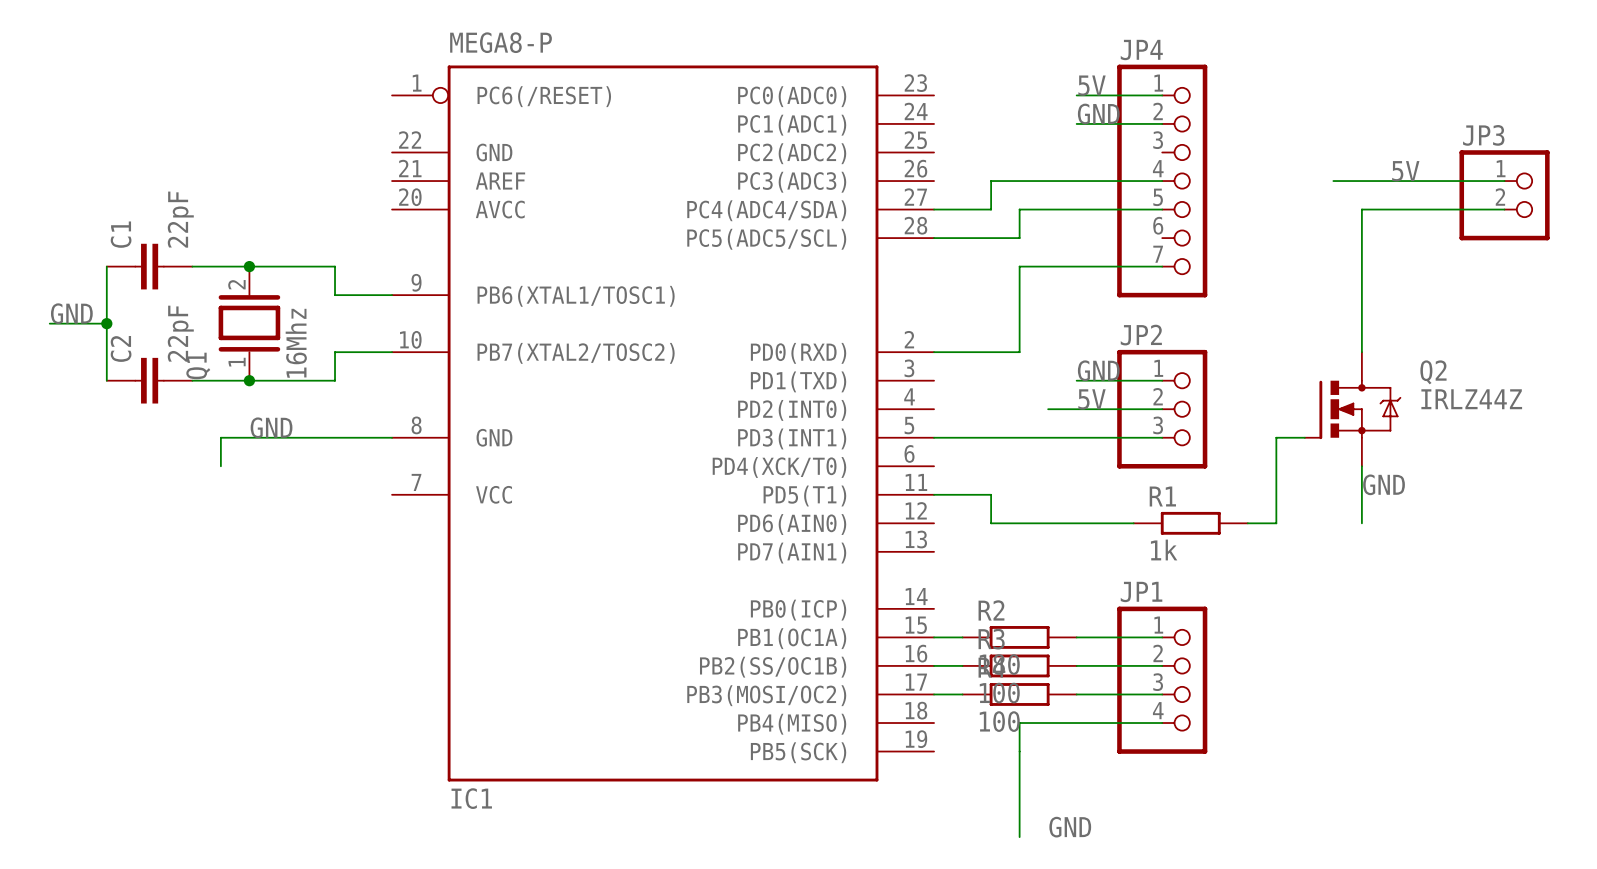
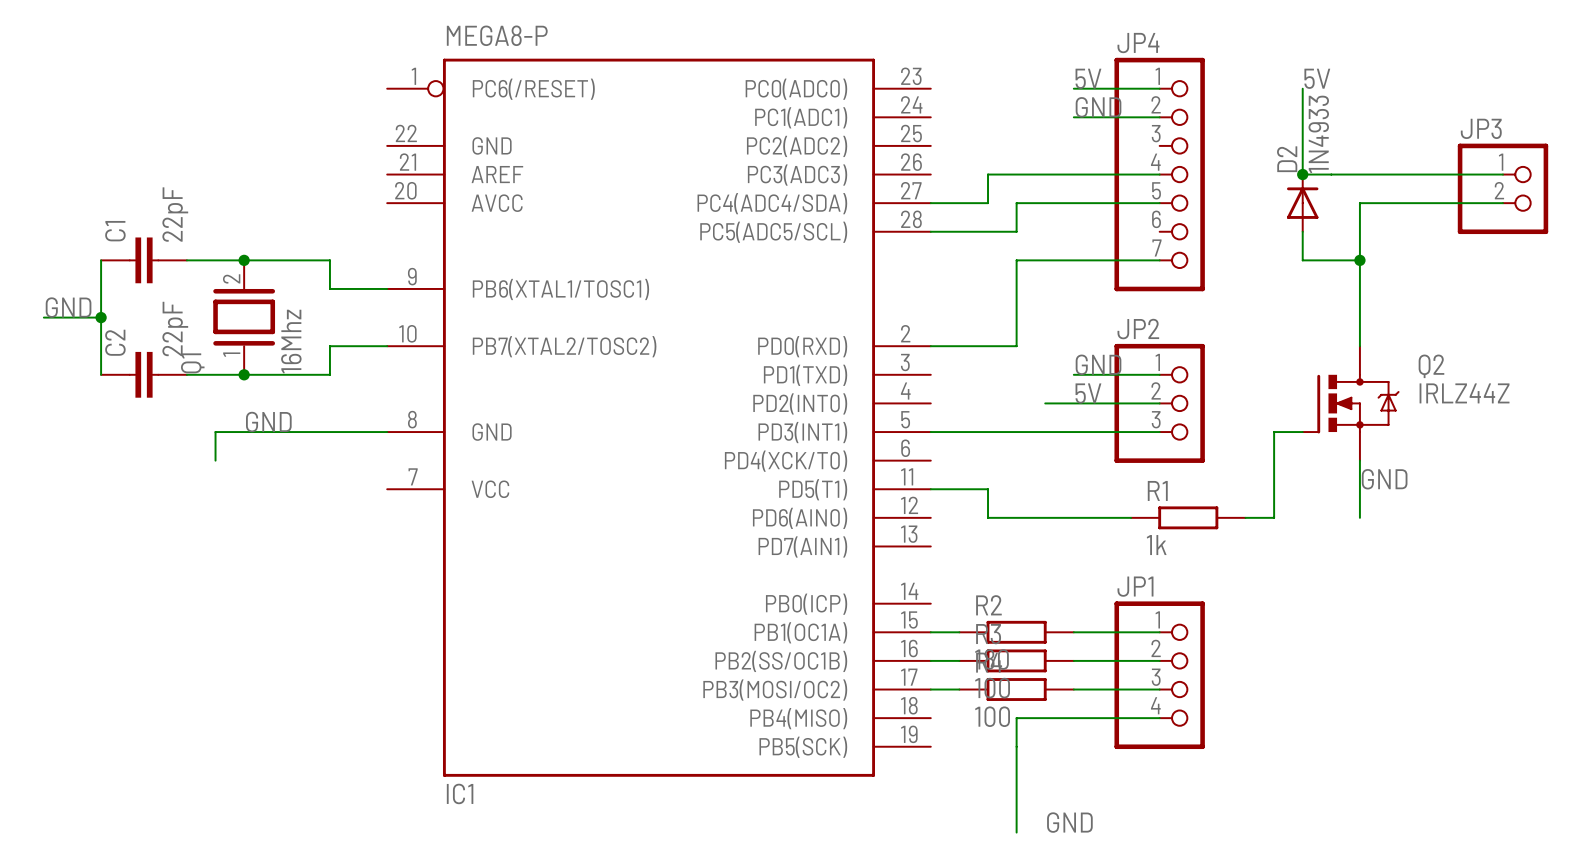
wire: none -> (1302, 88) (1302, 174) (1331, 174)
label position: 5V (1405, 171) -> 5V (1317, 78)
junction: none -> (1302, 174)
D2: none -> 1N4933 (1302, 203)
wire: none -> (1302, 231) (1302, 260) (1359, 260)
junction: none -> (1359, 260)

